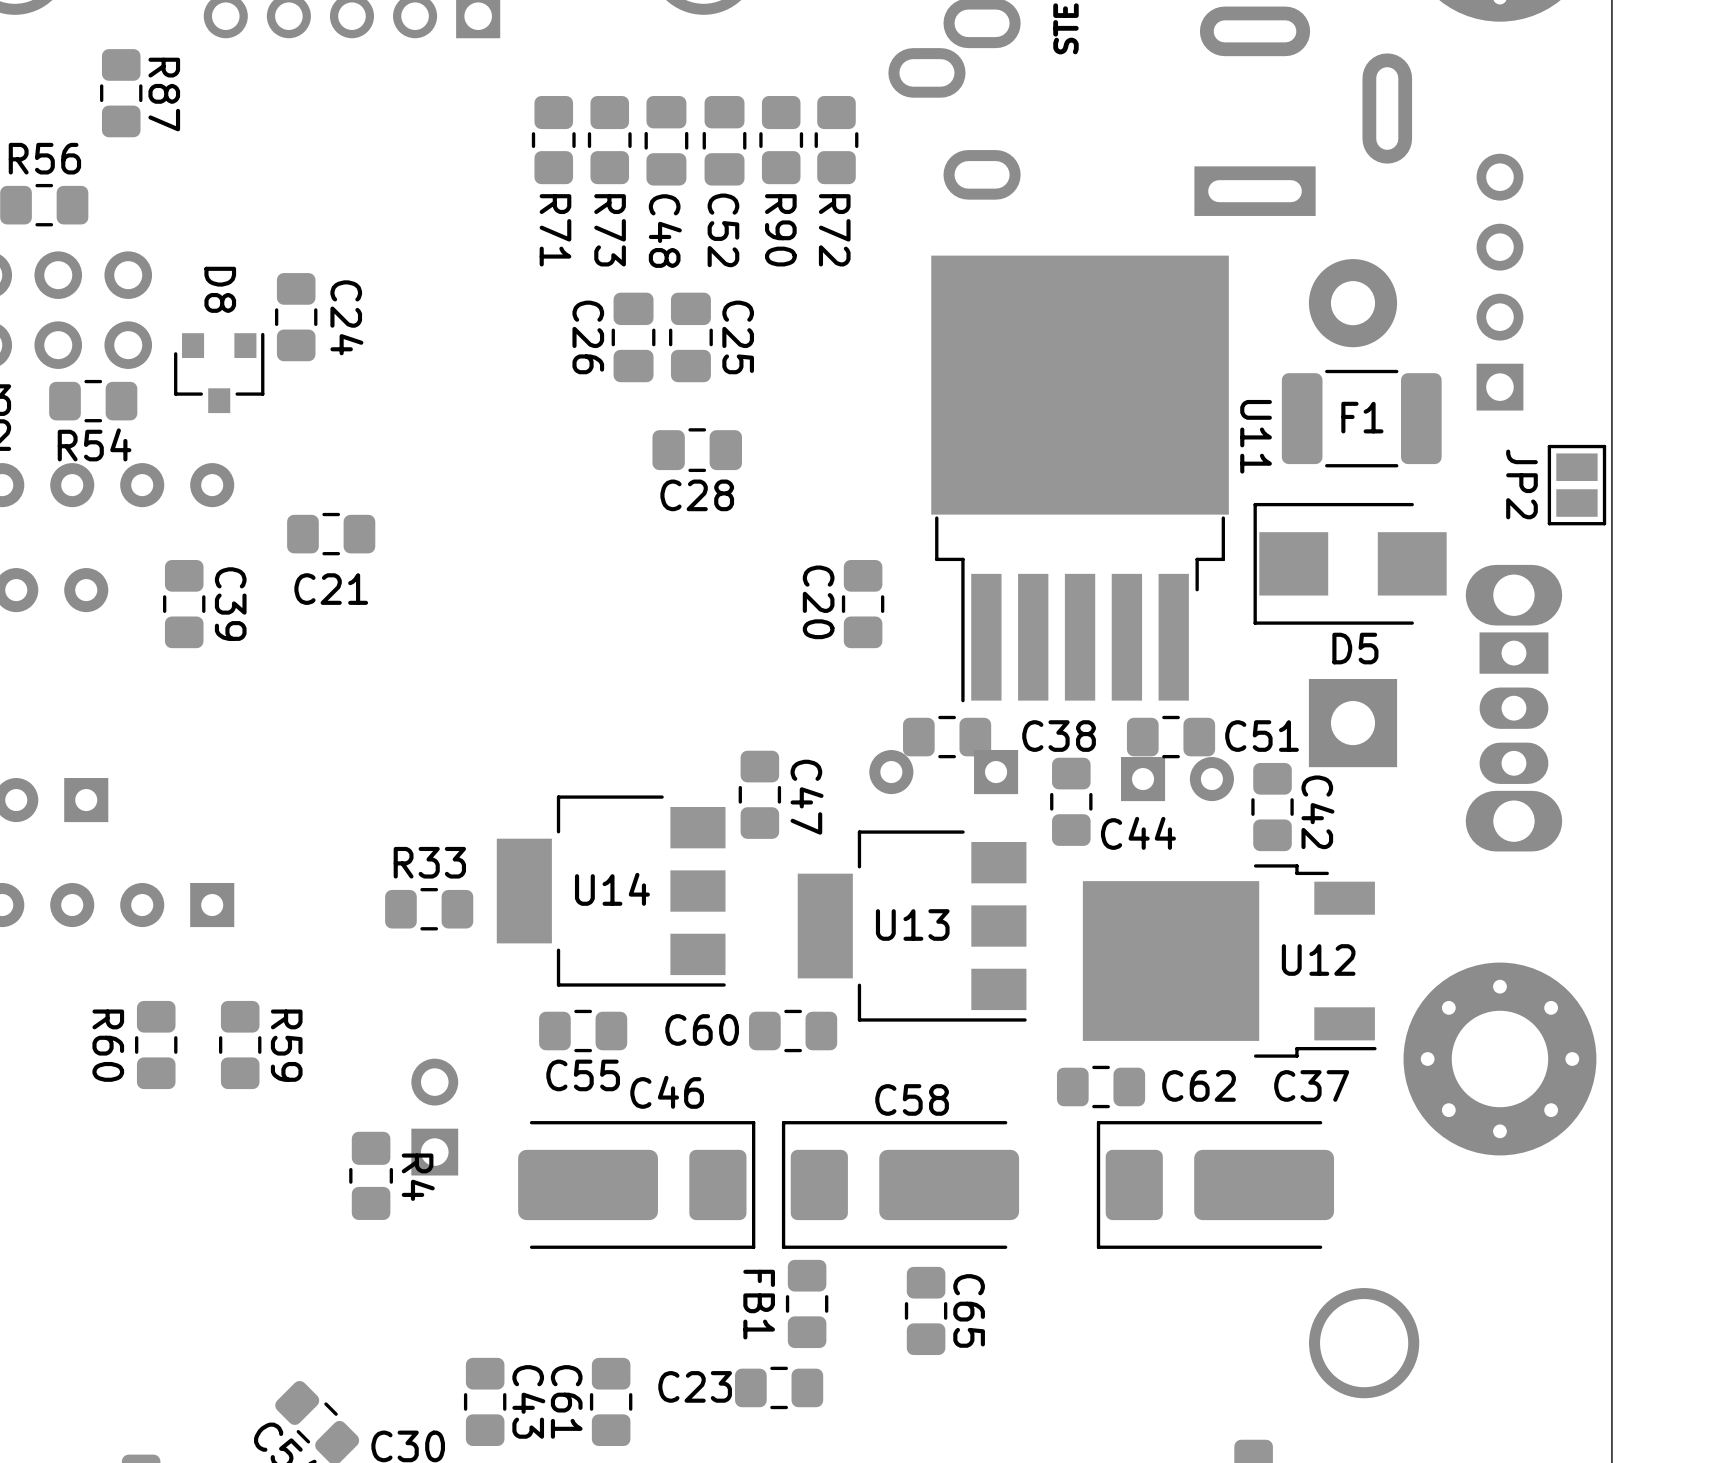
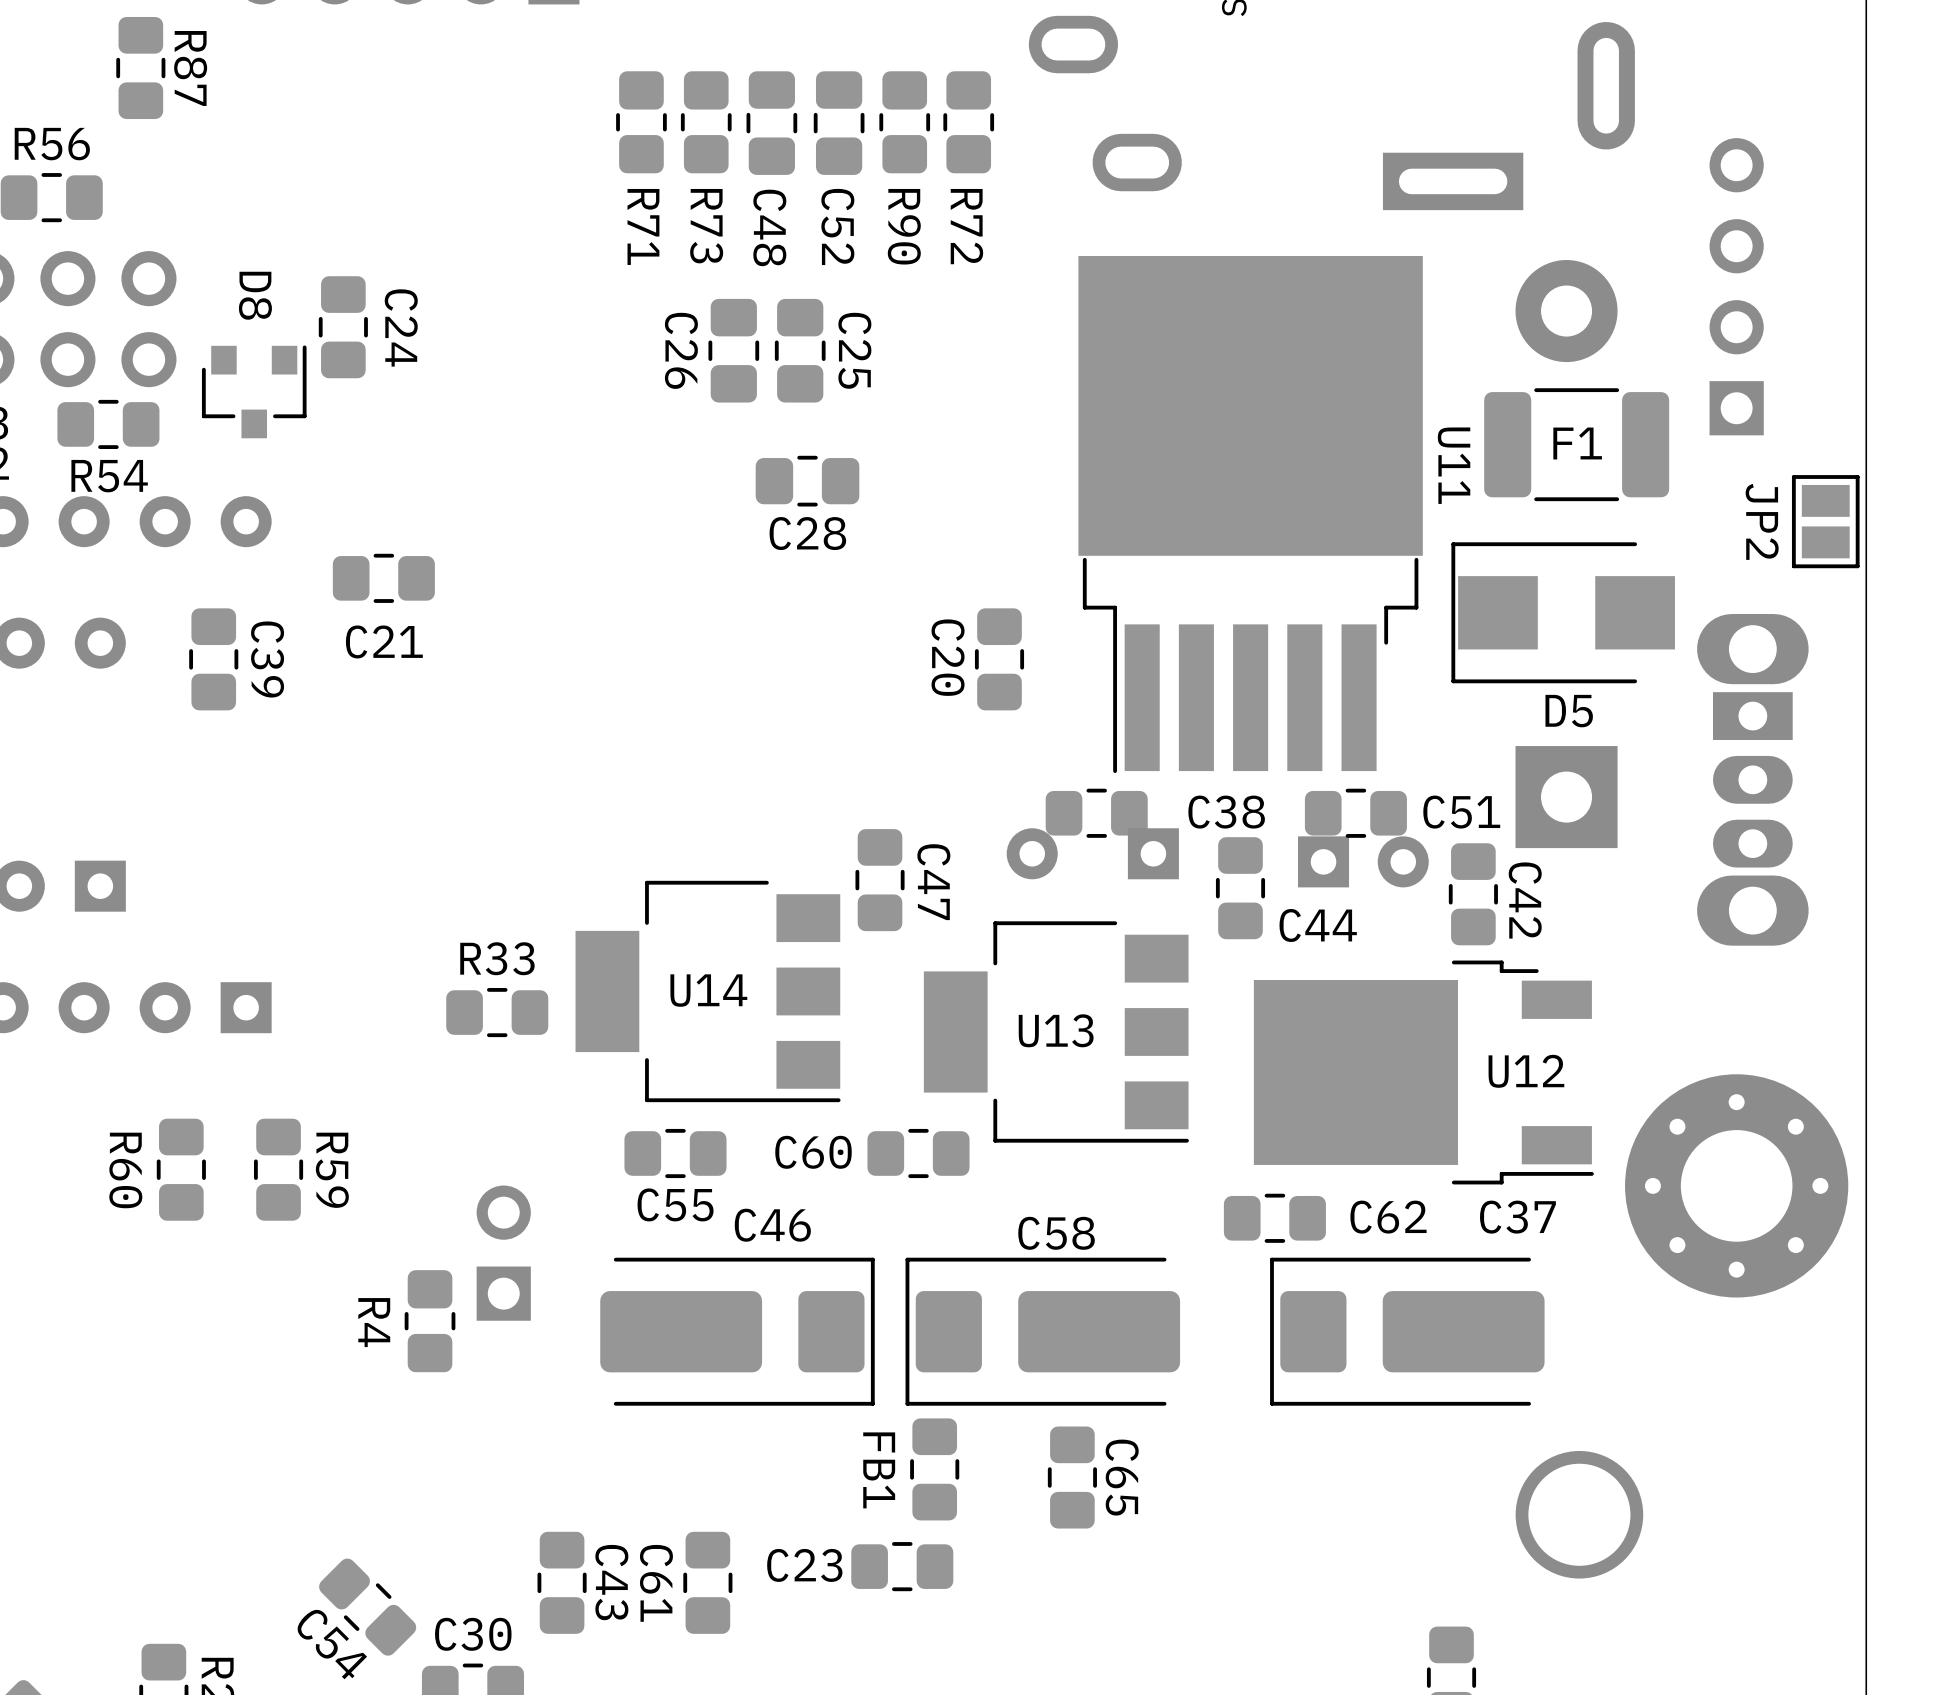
R4 name position: R4 (418, 1177) -> R4 (374, 1322)

